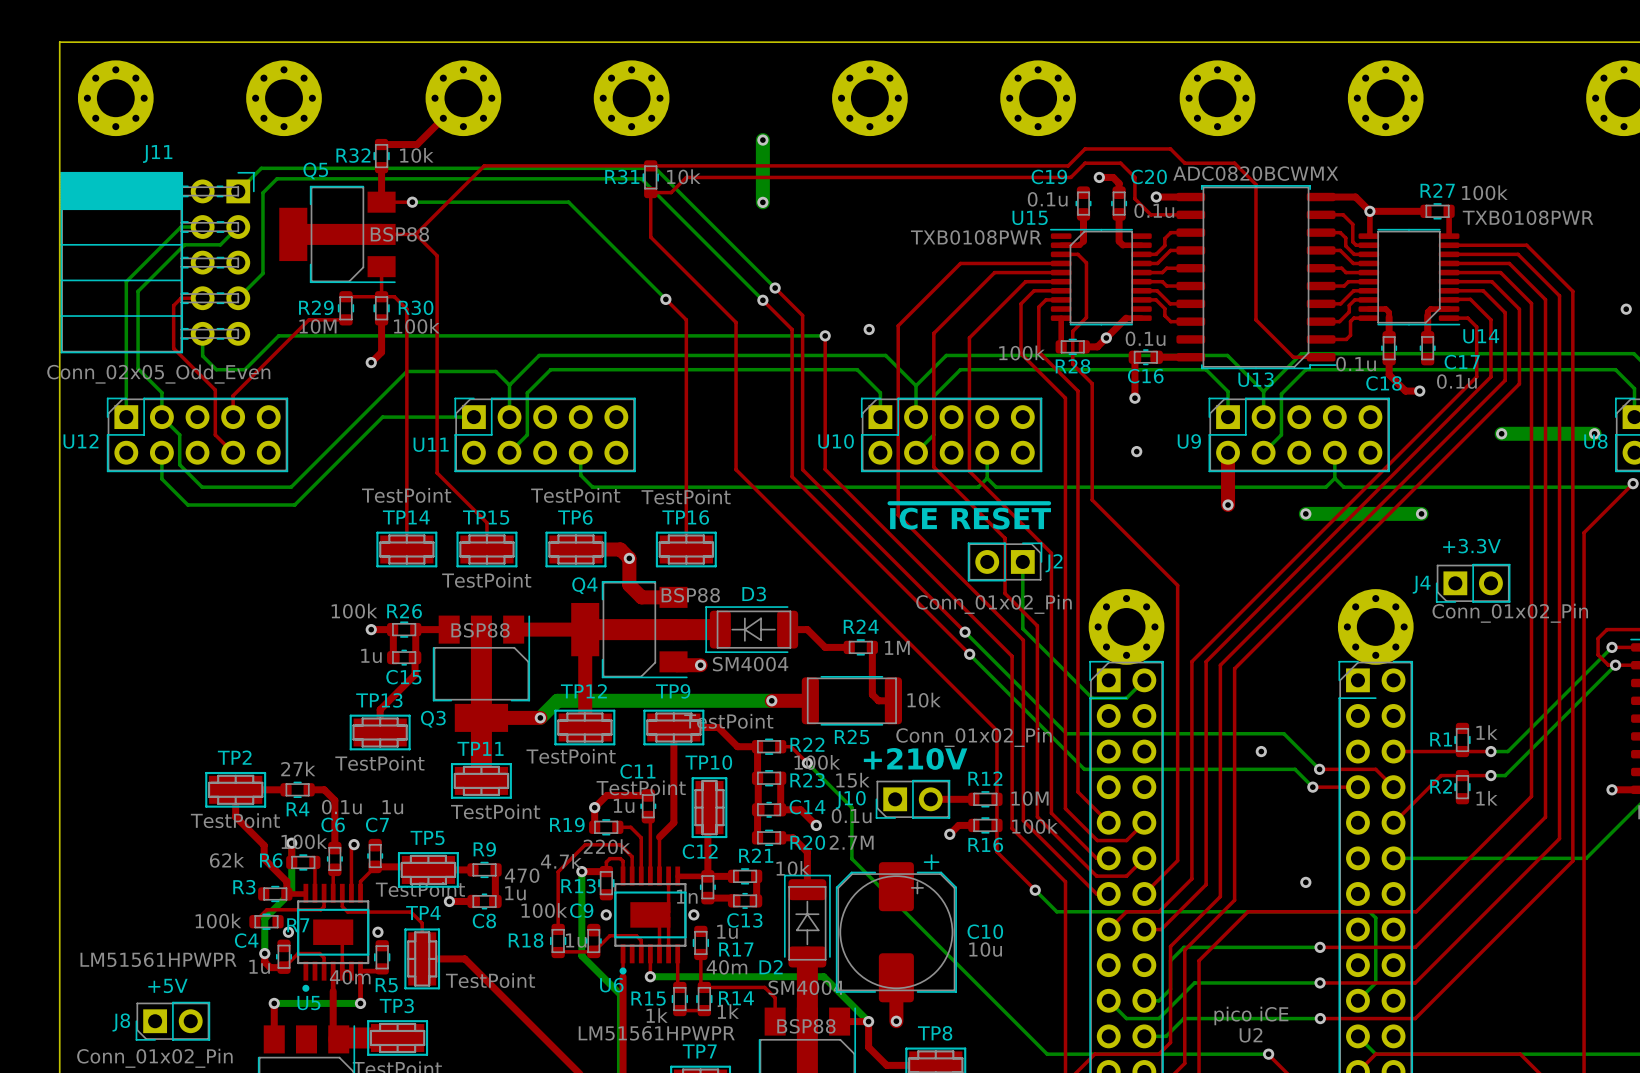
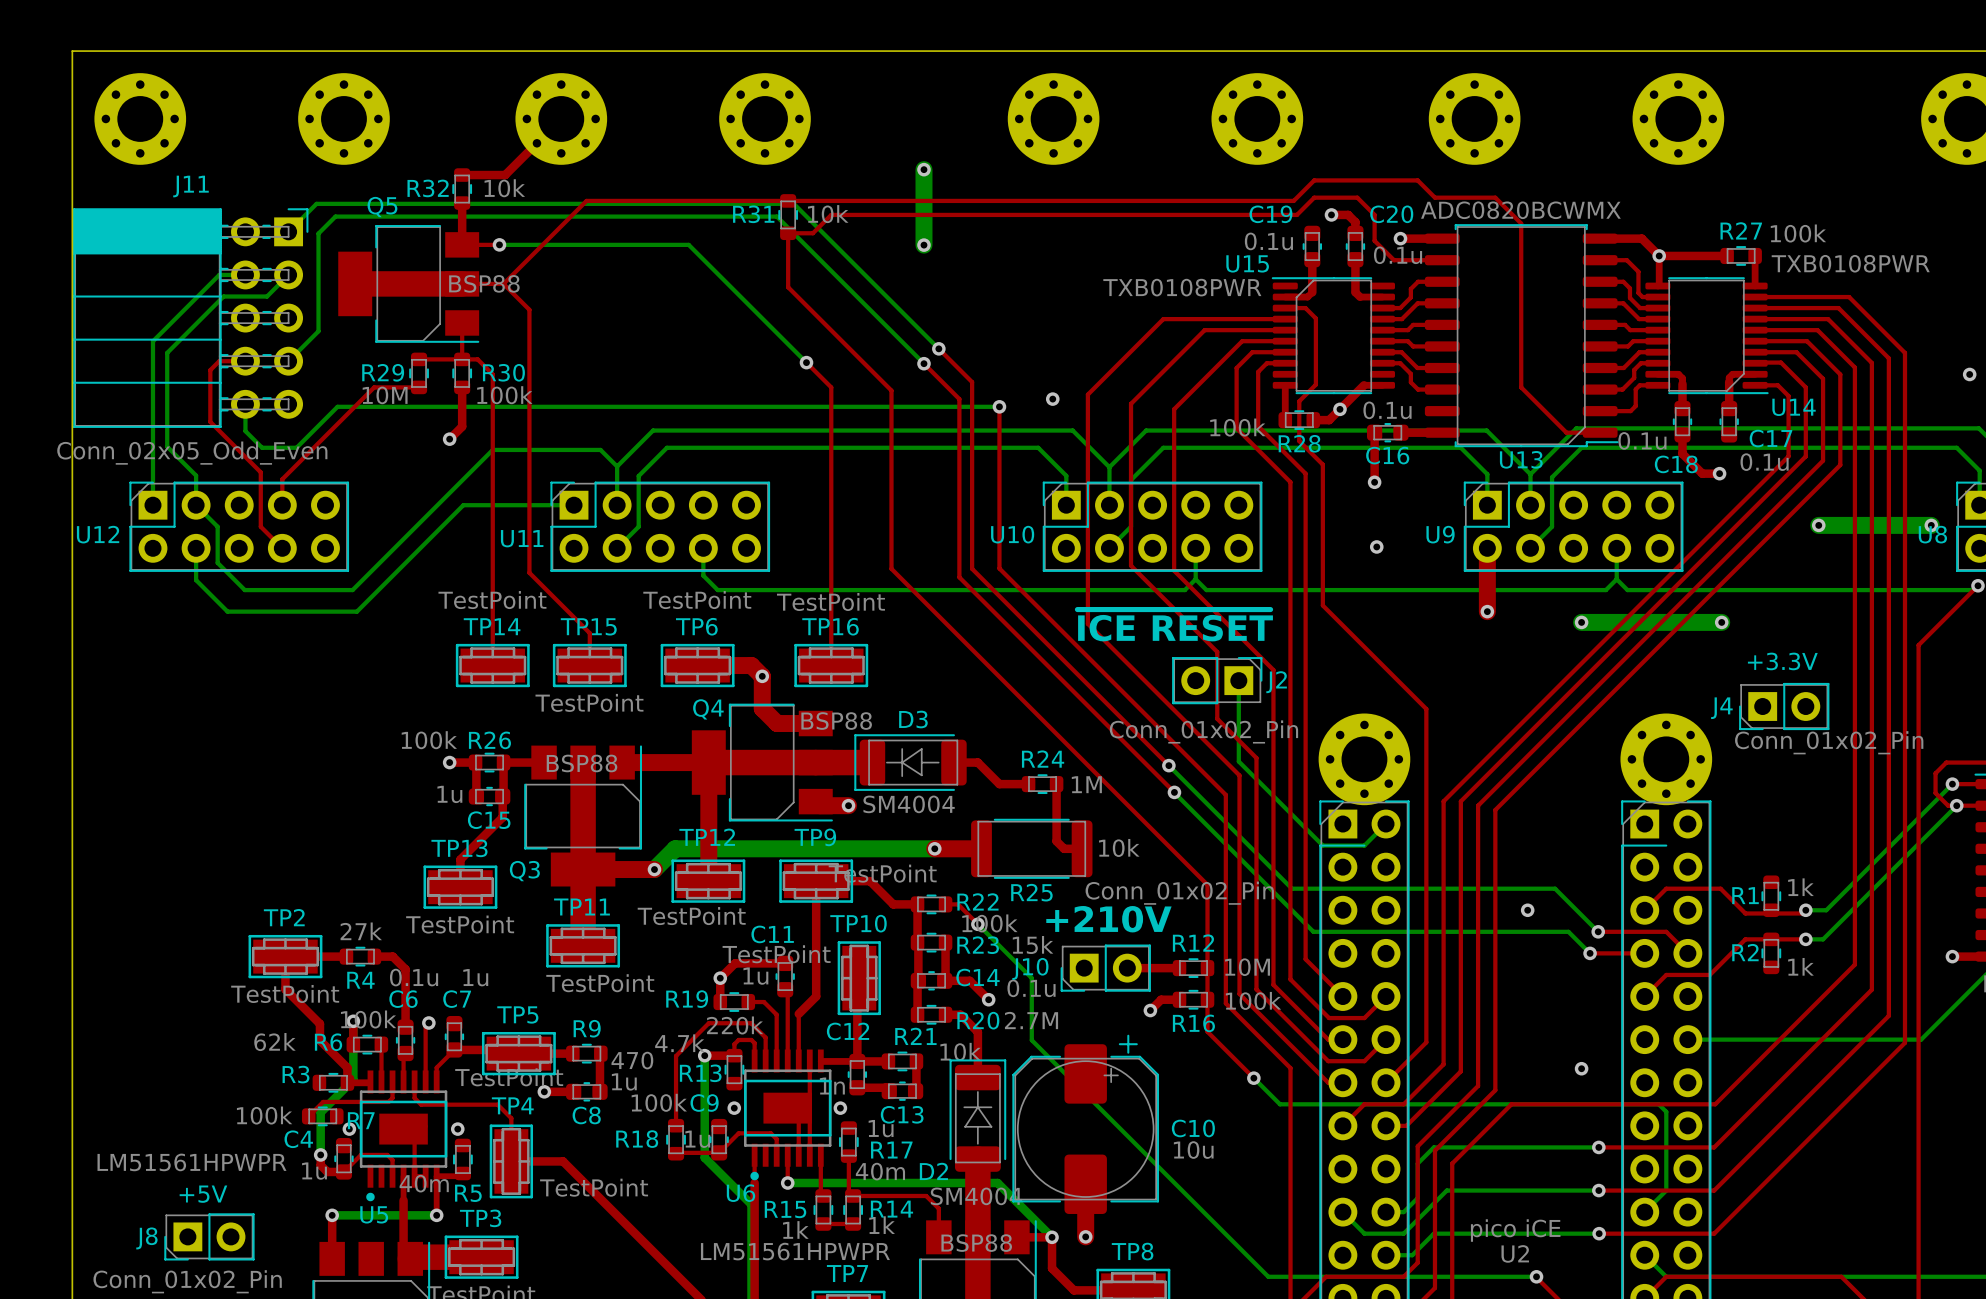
top track: none -> (1644, 910) (1666, 888) (1720, 888) (1745, 913) (1805, 913)
top track: (1393, 751) (1490, 751) -> none
top track: (1411, 804) (1393, 822) -> (1709, 974) (1666, 974) (1644, 996)

